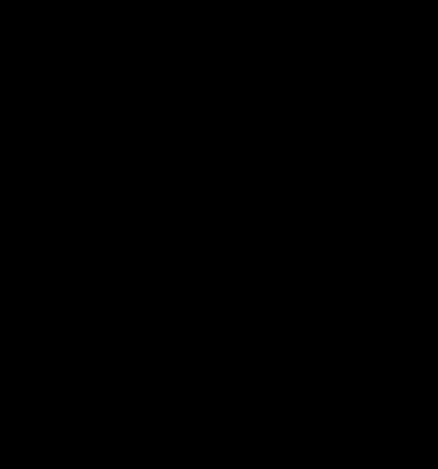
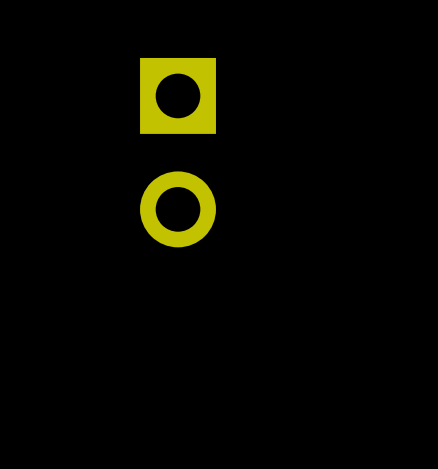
part: none -> (178, 152)

